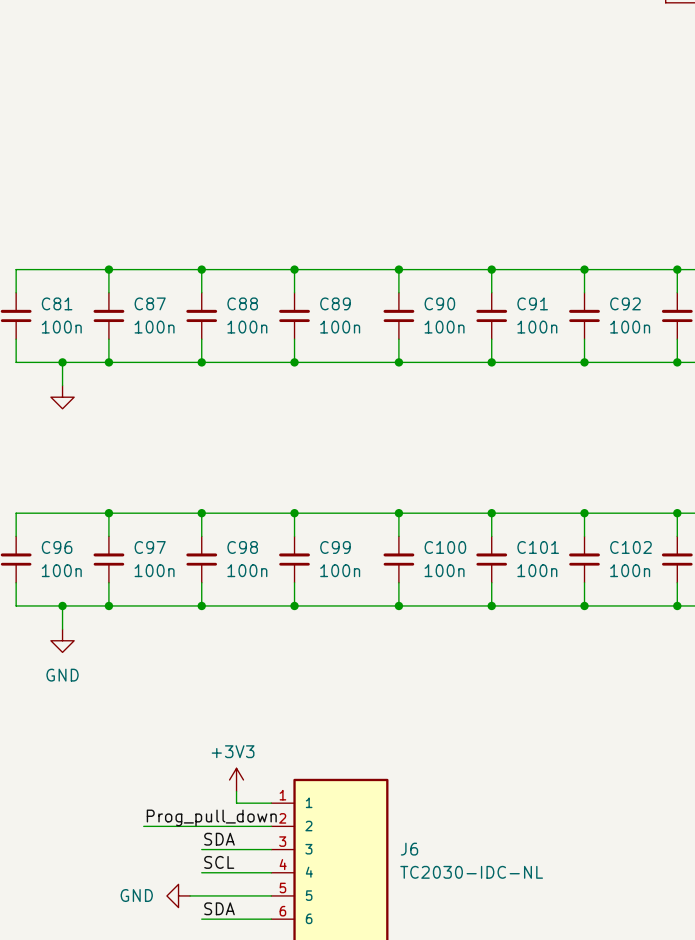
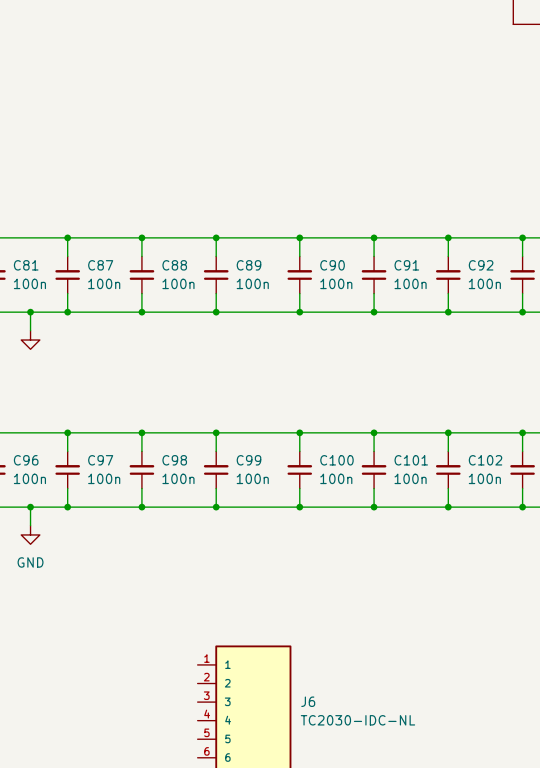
power symbol: +3V3 (236, 779) -> none
wire: (236, 791) (236, 803) (271, 803) -> none
label: Prog_pull_down (211, 817) -> none
wire: (143, 826) (271, 826) -> none
label: SDA (219, 839) -> none
wire: (201, 849) (271, 849) -> none
label: SCL (219, 862) -> none
wire: (201, 872) (271, 872) -> none
power symbol: GND (178, 895) -> none
wire: (190, 895) (271, 895) -> none
label: SDA (219, 908) -> none
wire: (201, 919) (271, 919) -> none

